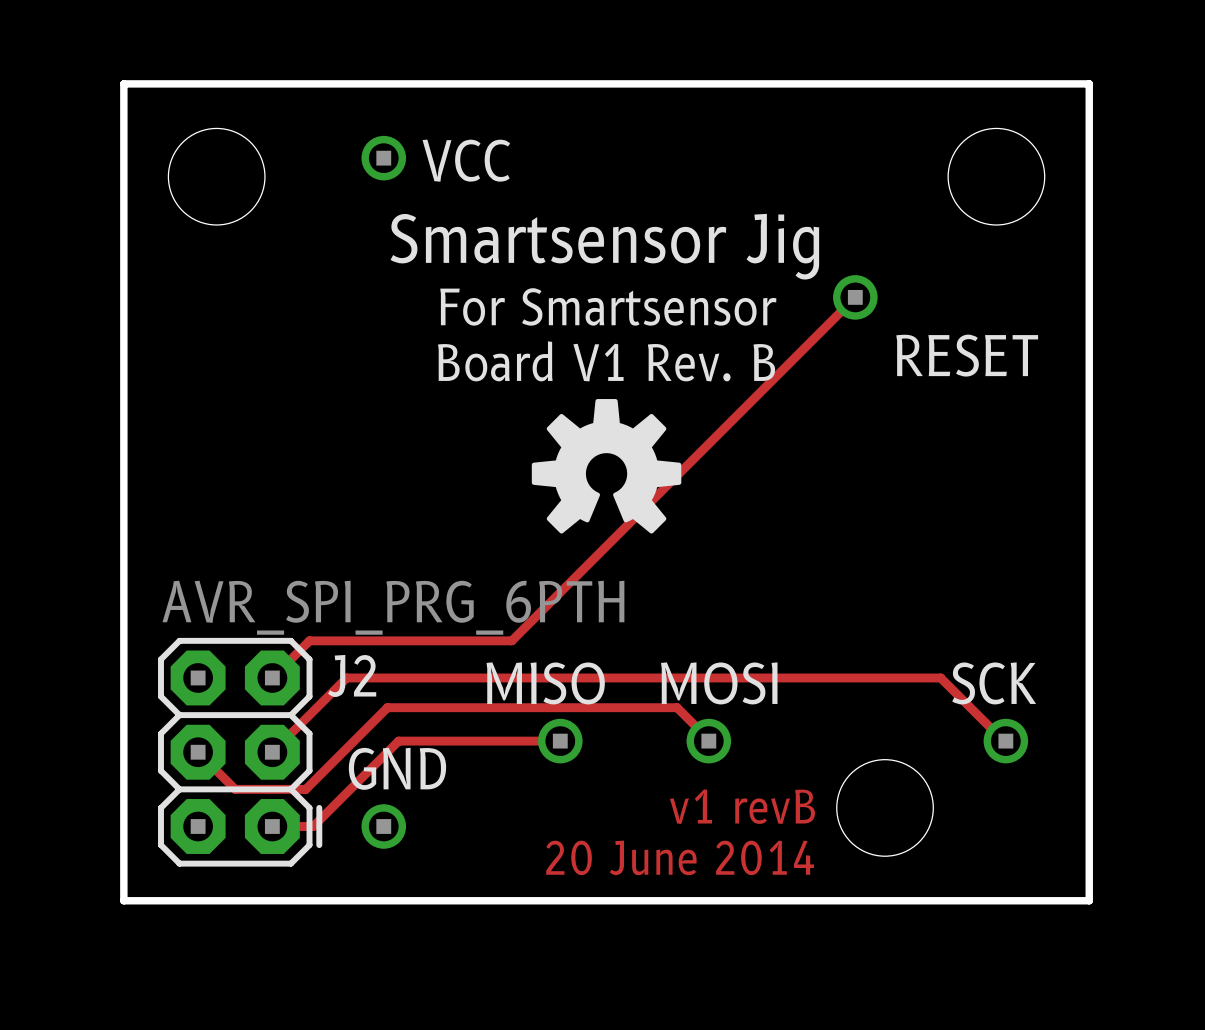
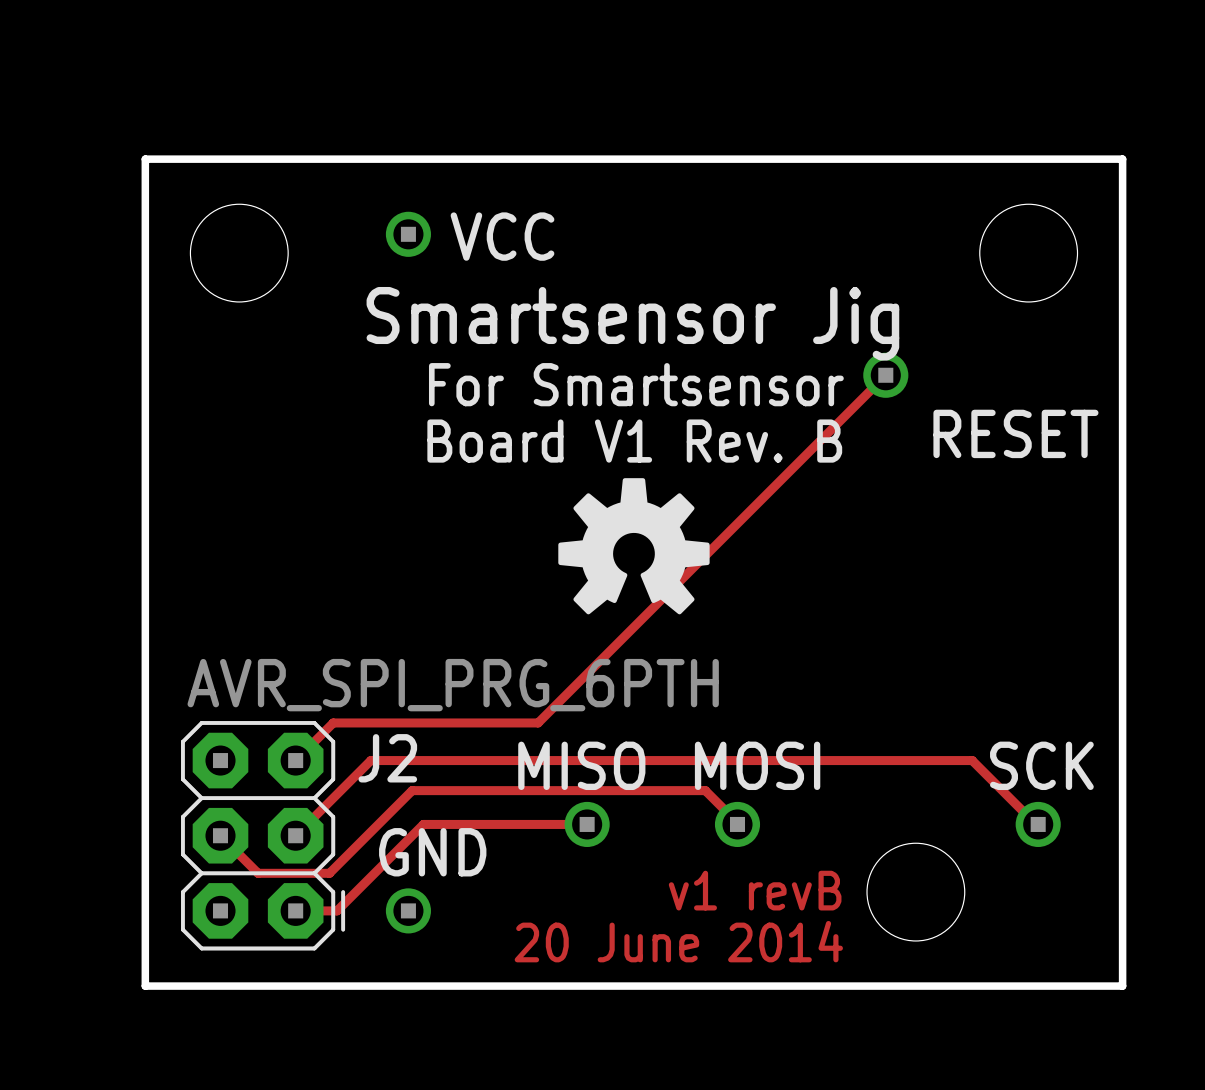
J2 footprint: [158, 637, 323, 867] -> [181, 721, 346, 951]

